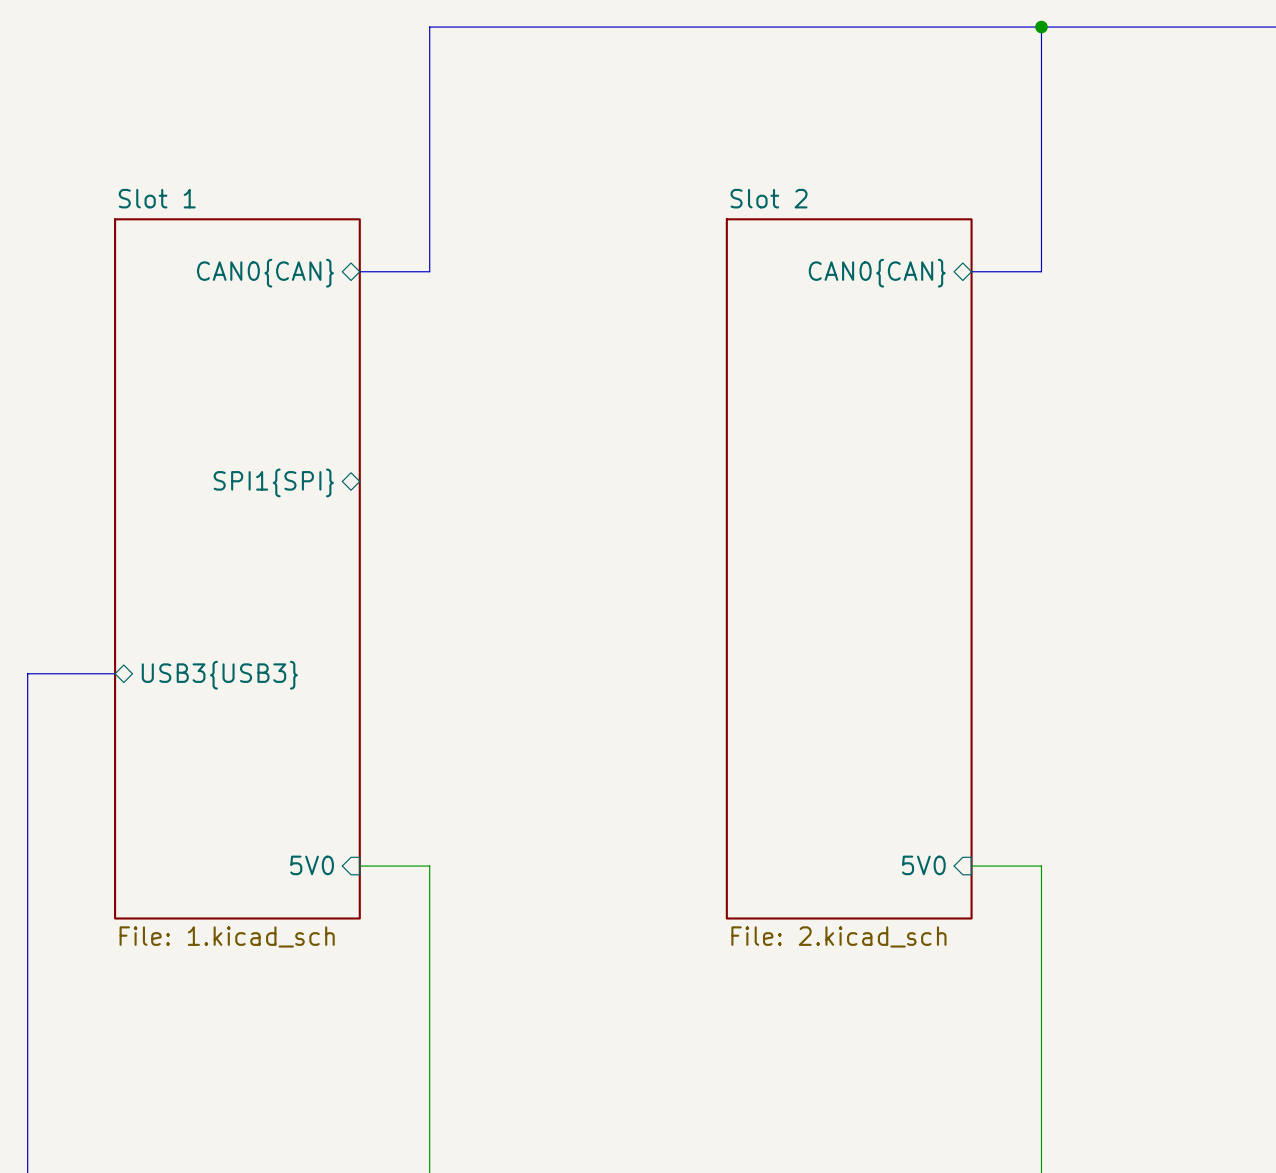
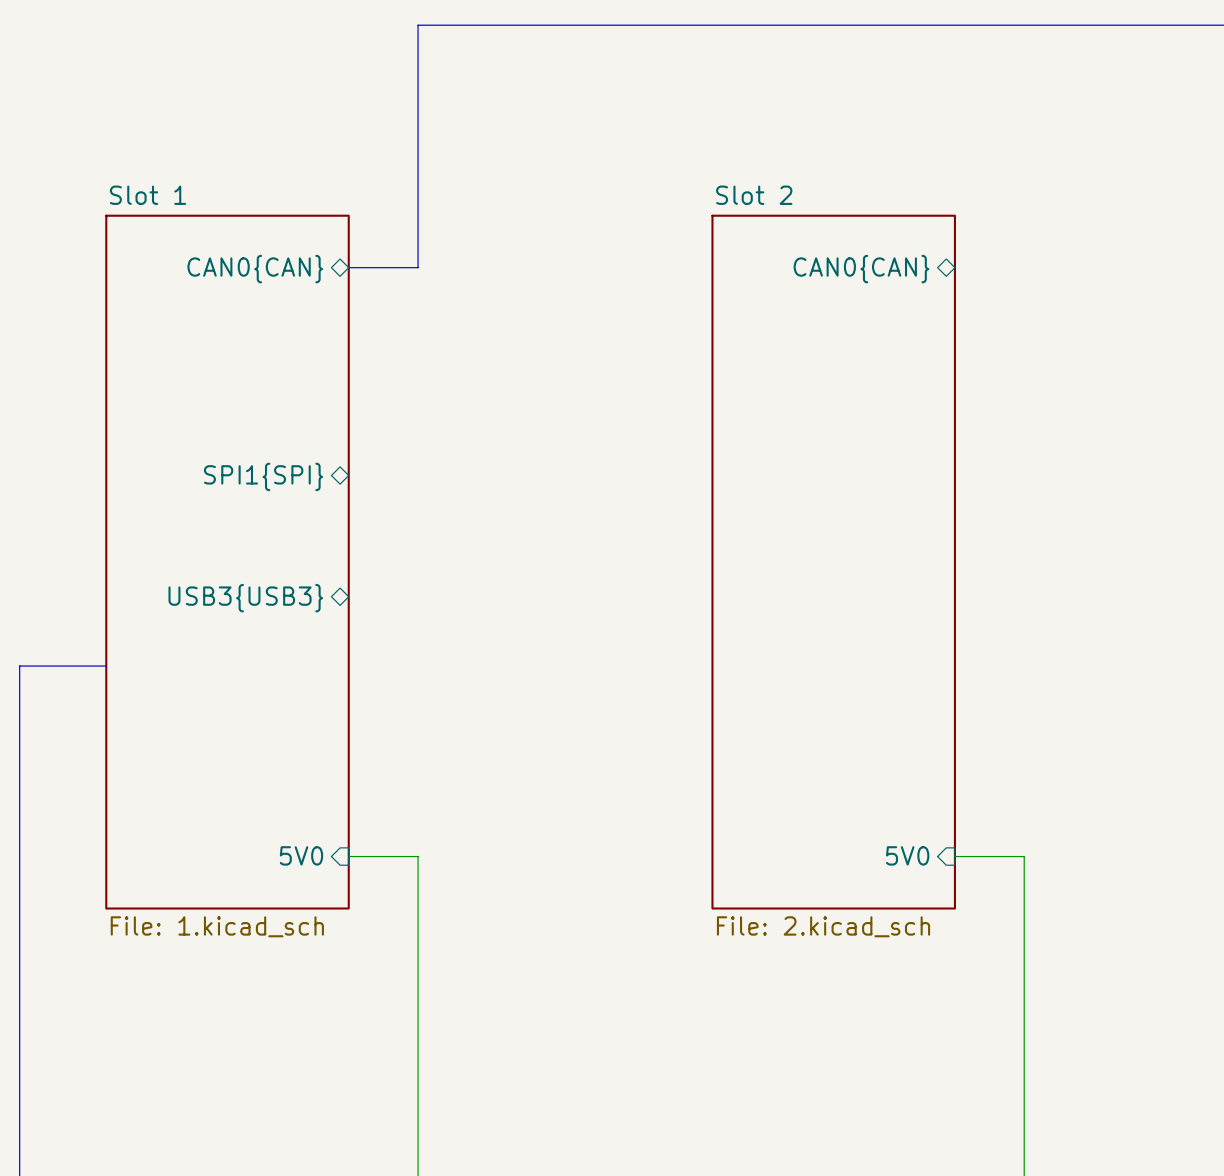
bus: (1041, 27) (1041, 271) (971, 271) -> none
junction: (1041, 27) -> none
sheet pin rotation: 0° (219, 675) -> 180° (245, 598)

